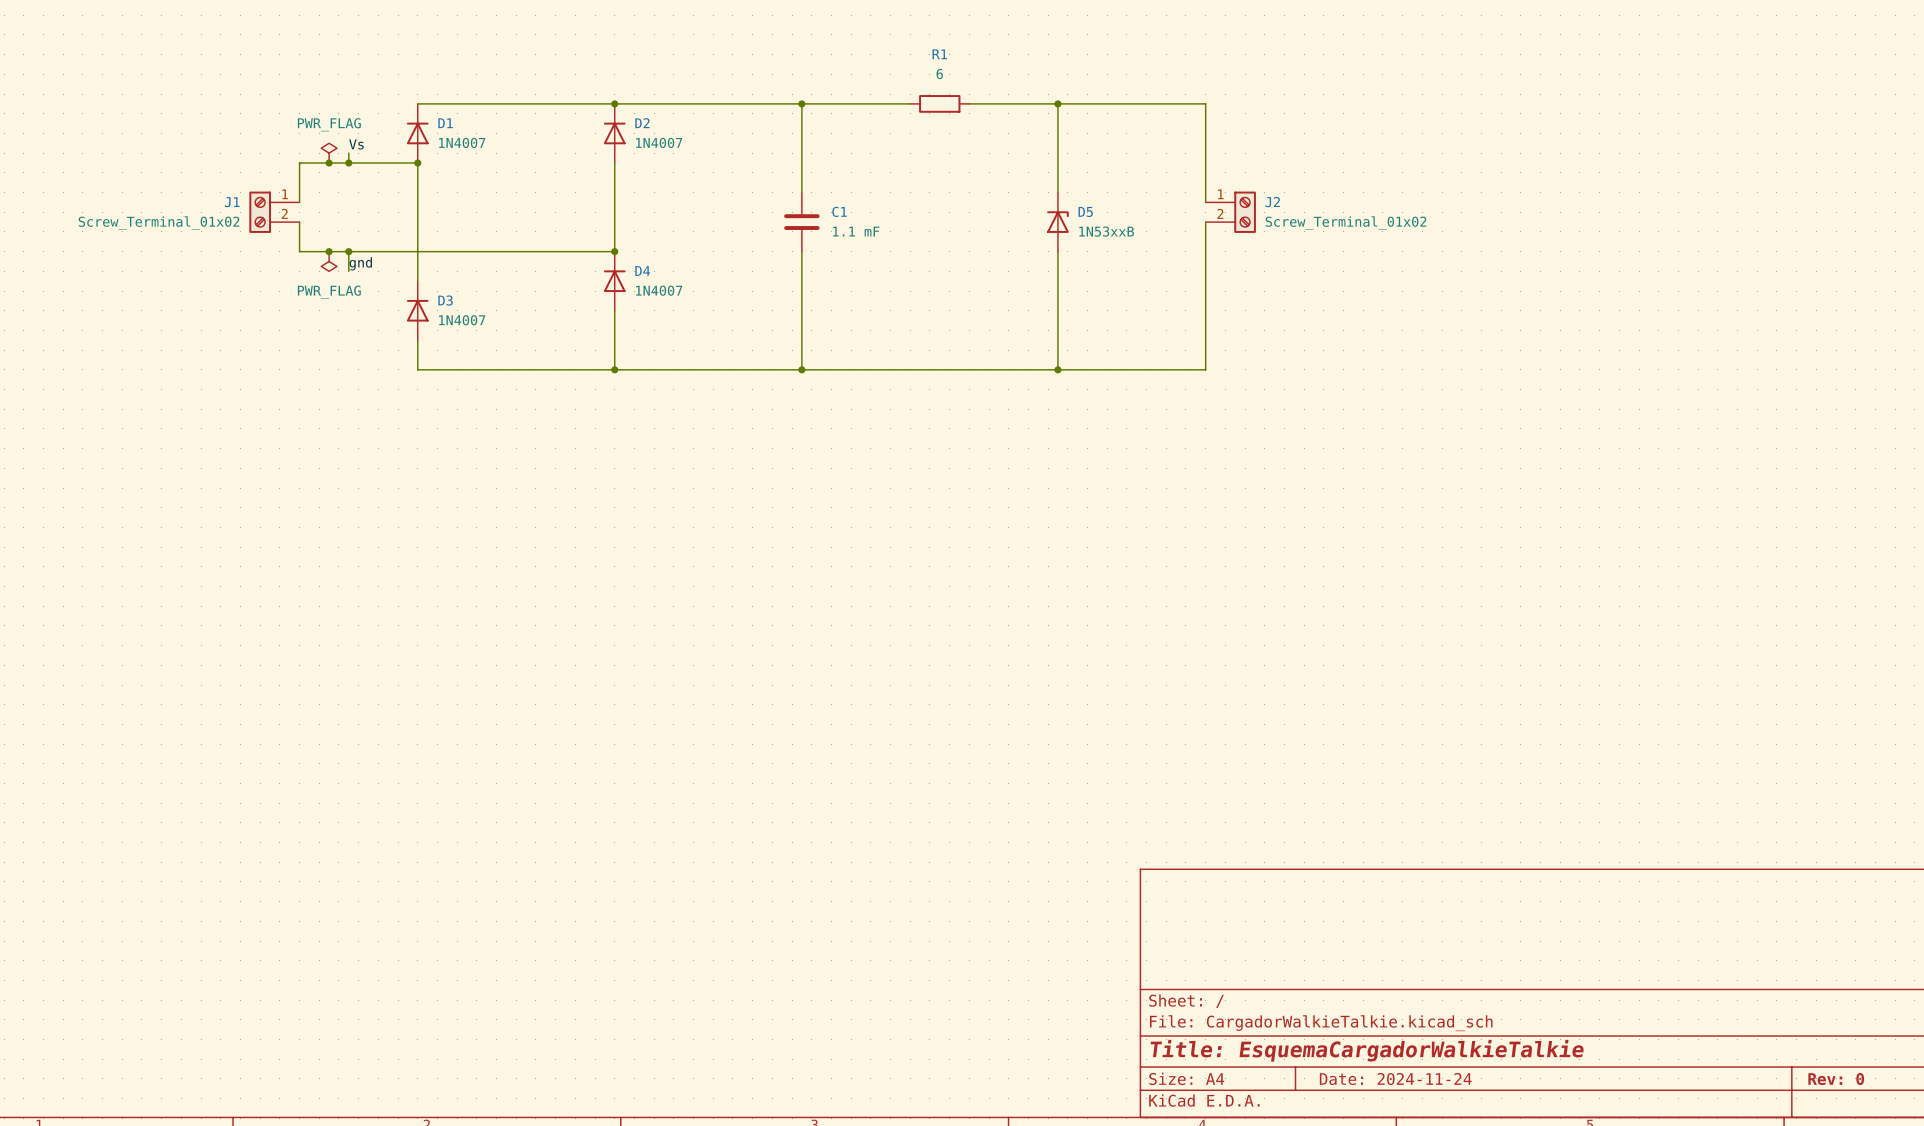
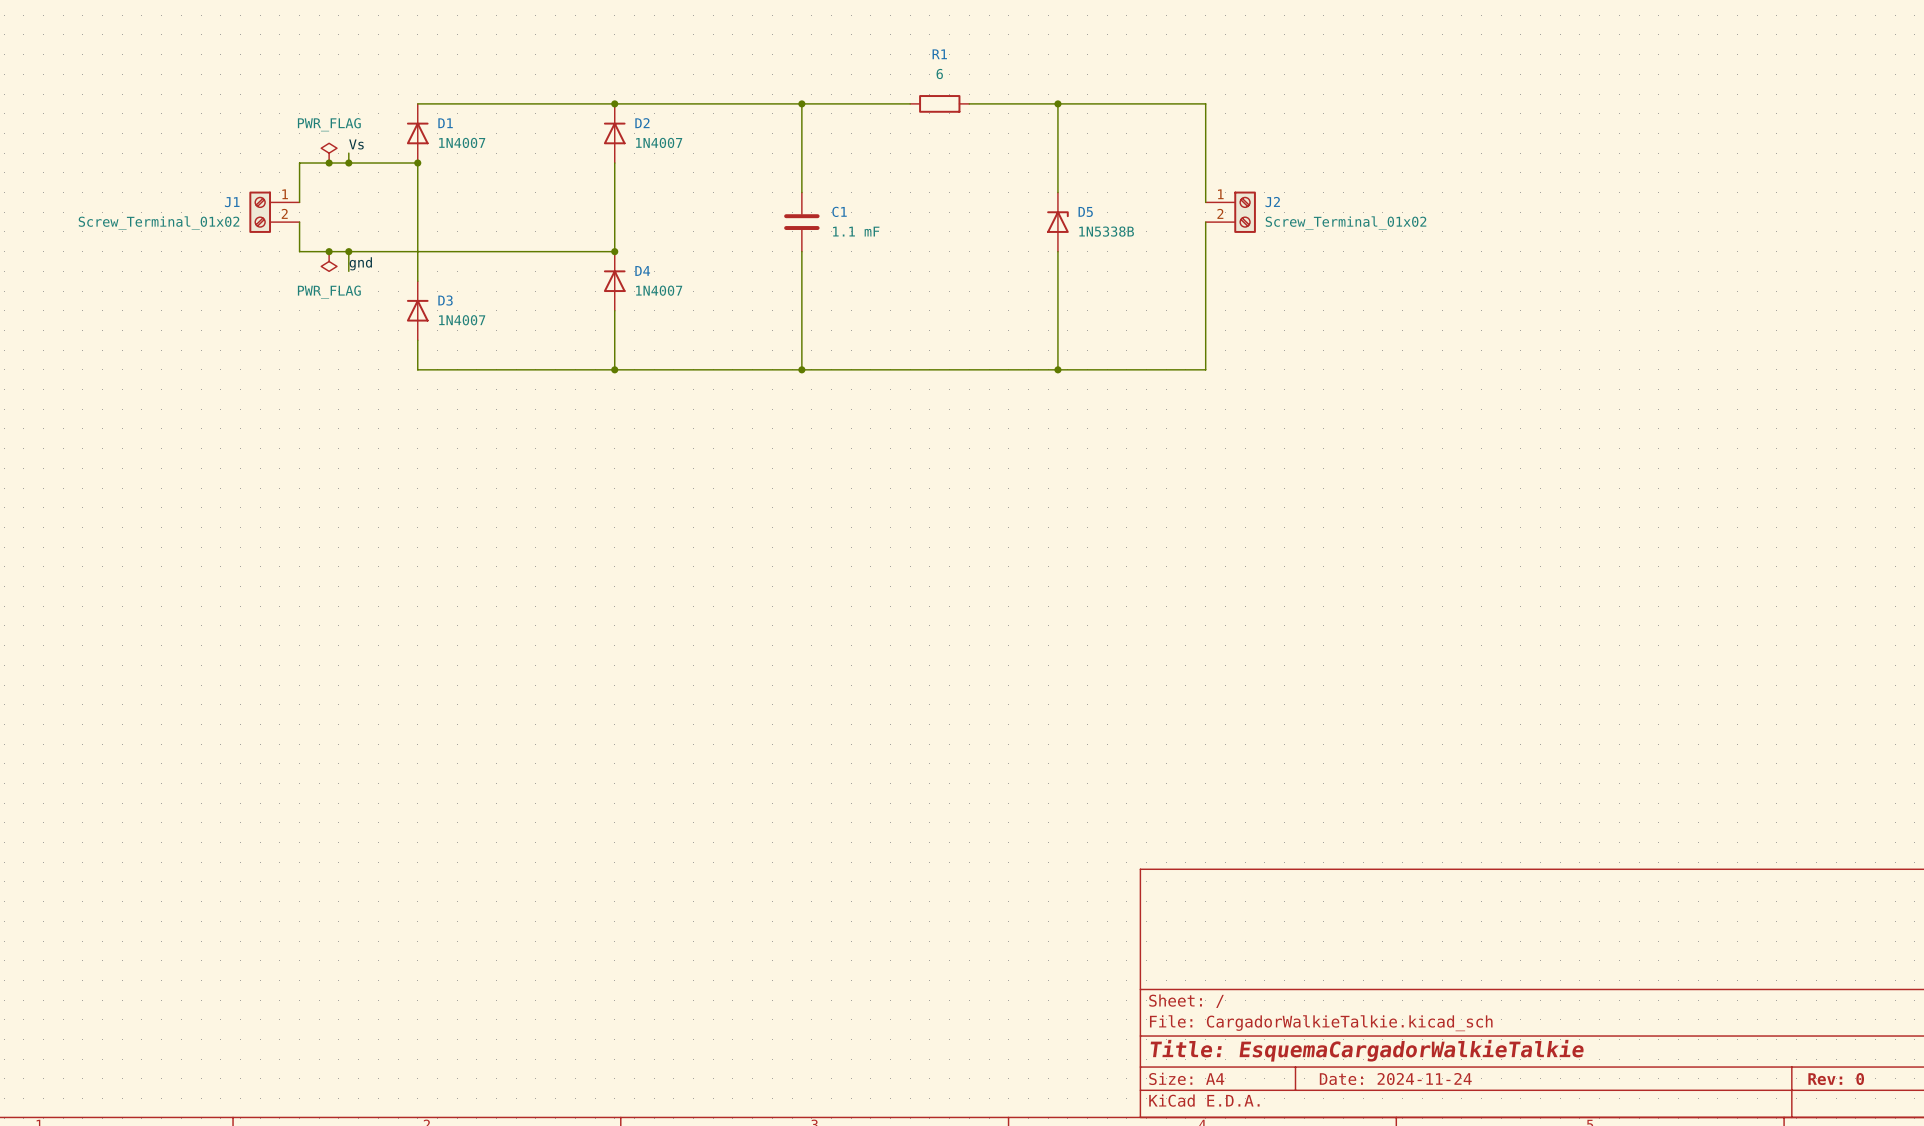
D5 value: 1N53xxB (1106, 231) -> 1N5338B (1106, 231)

